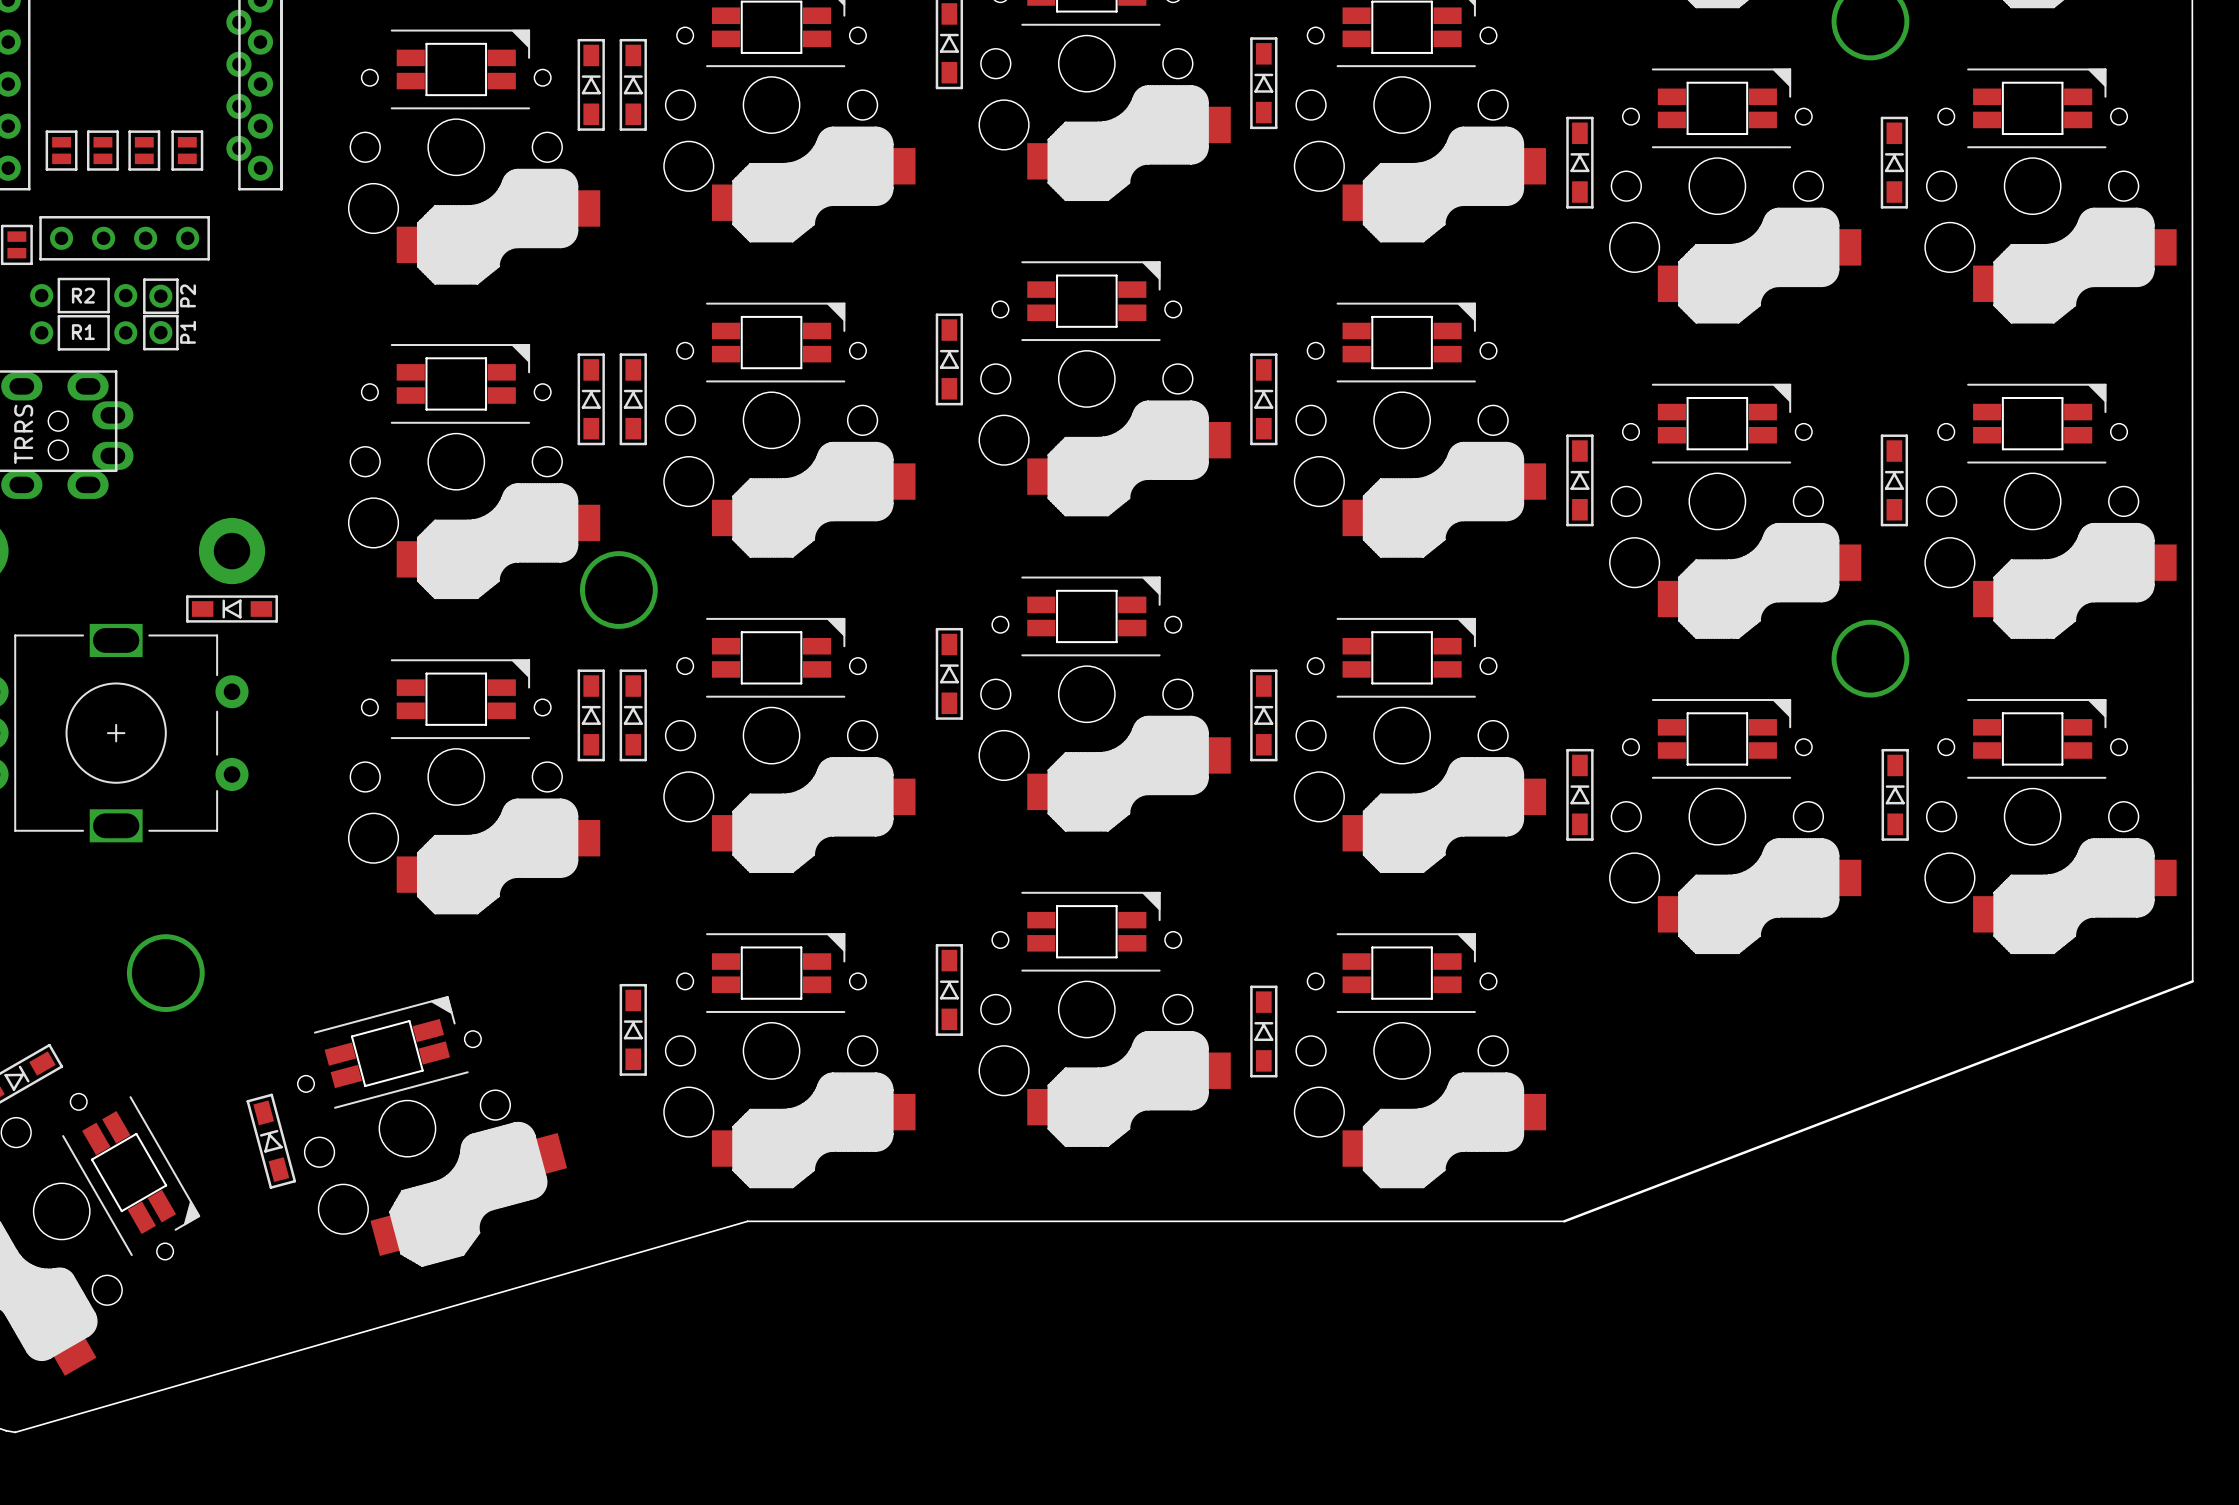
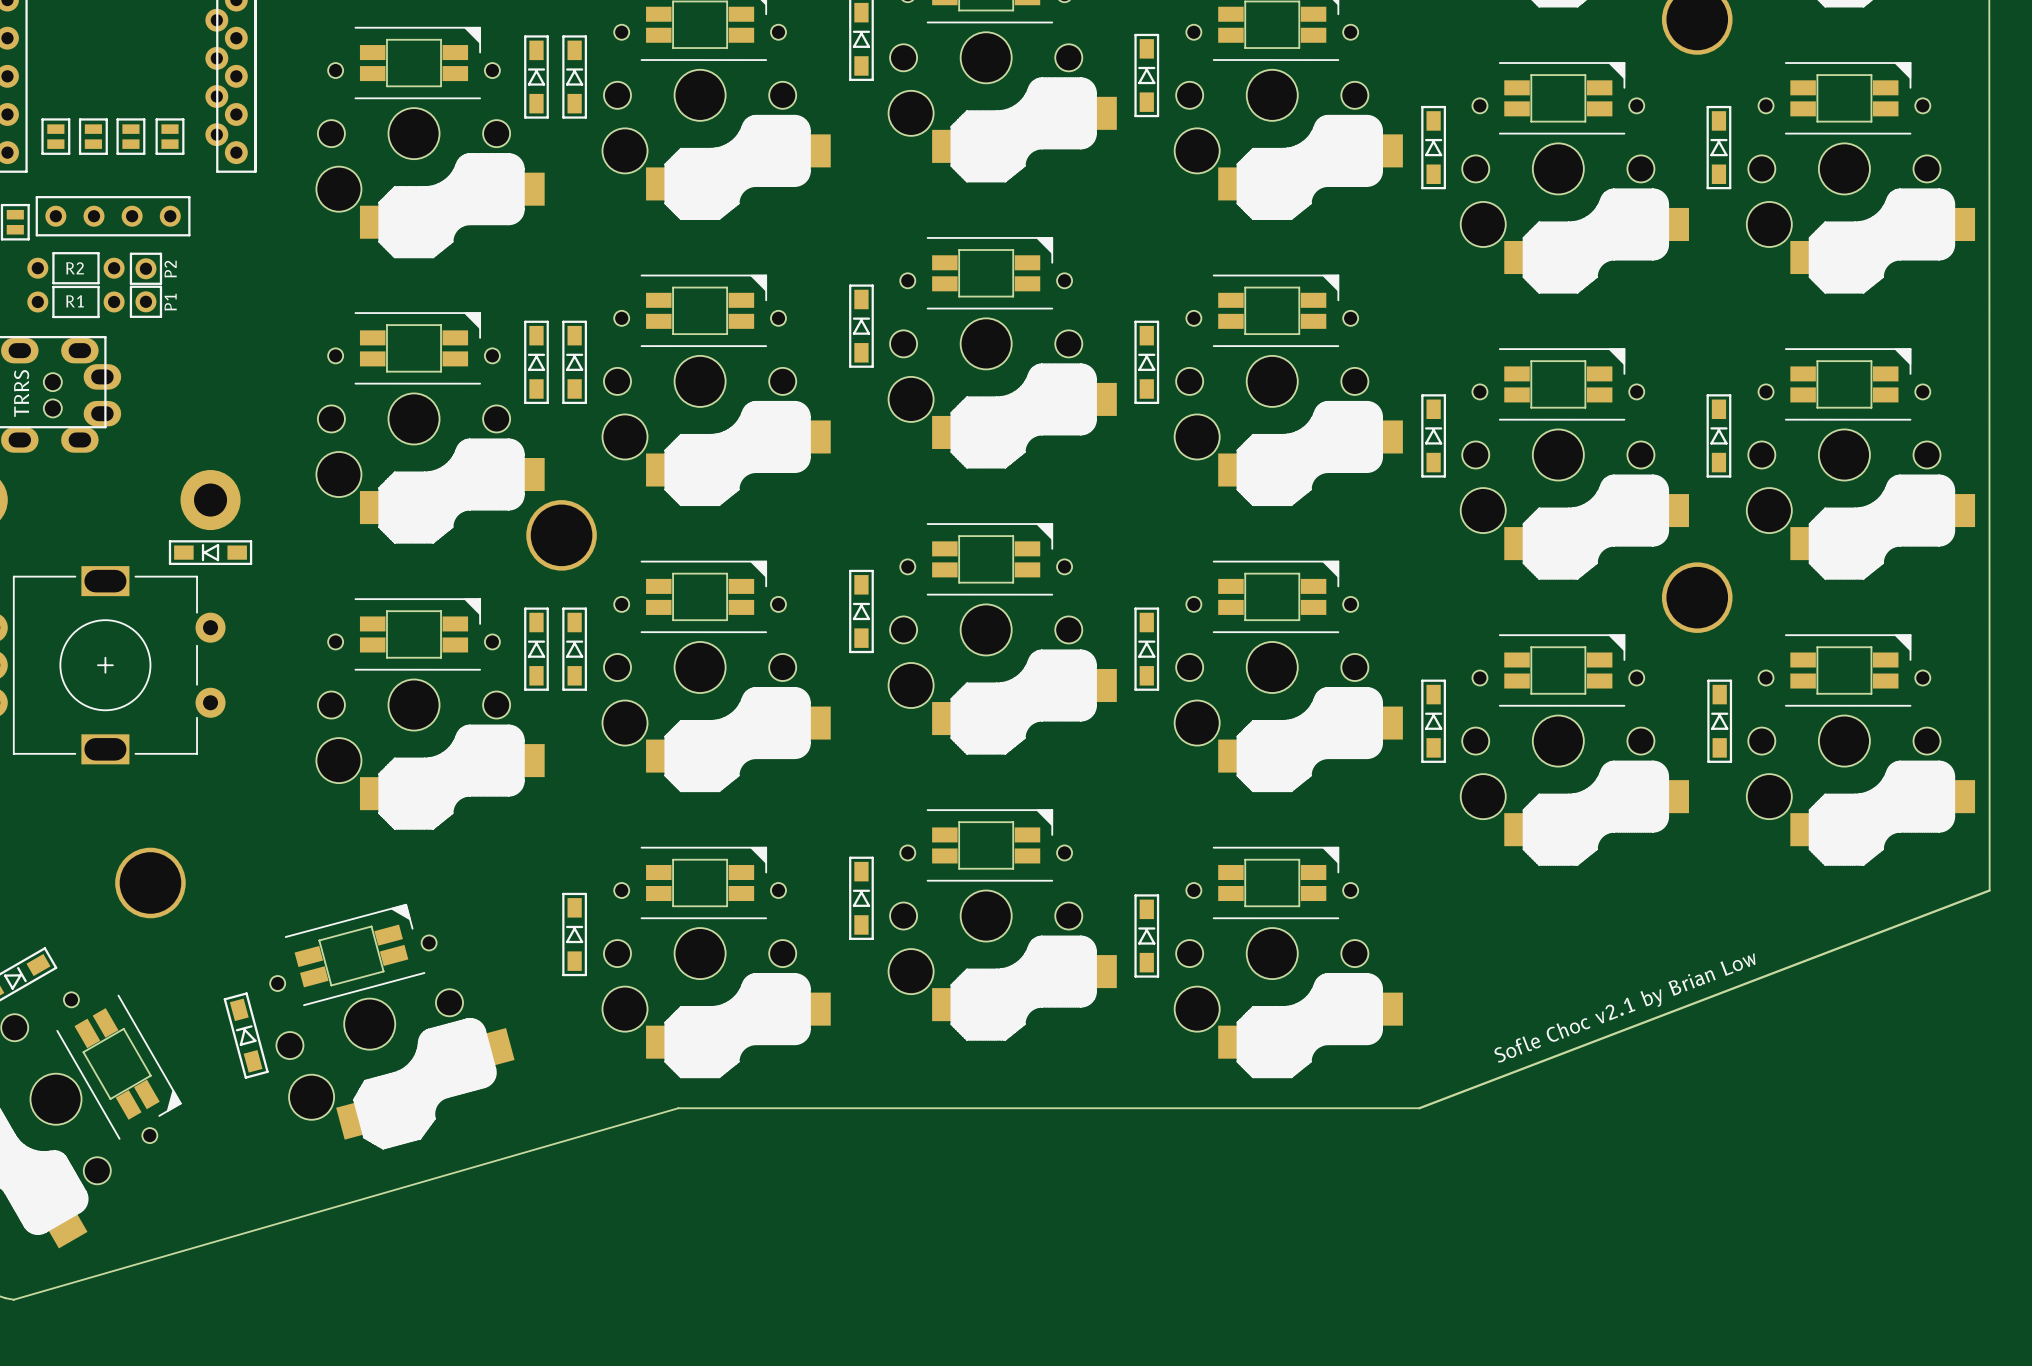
text: none -> Sofle Choc v2.1 by Brian Low (1624, 1007)

